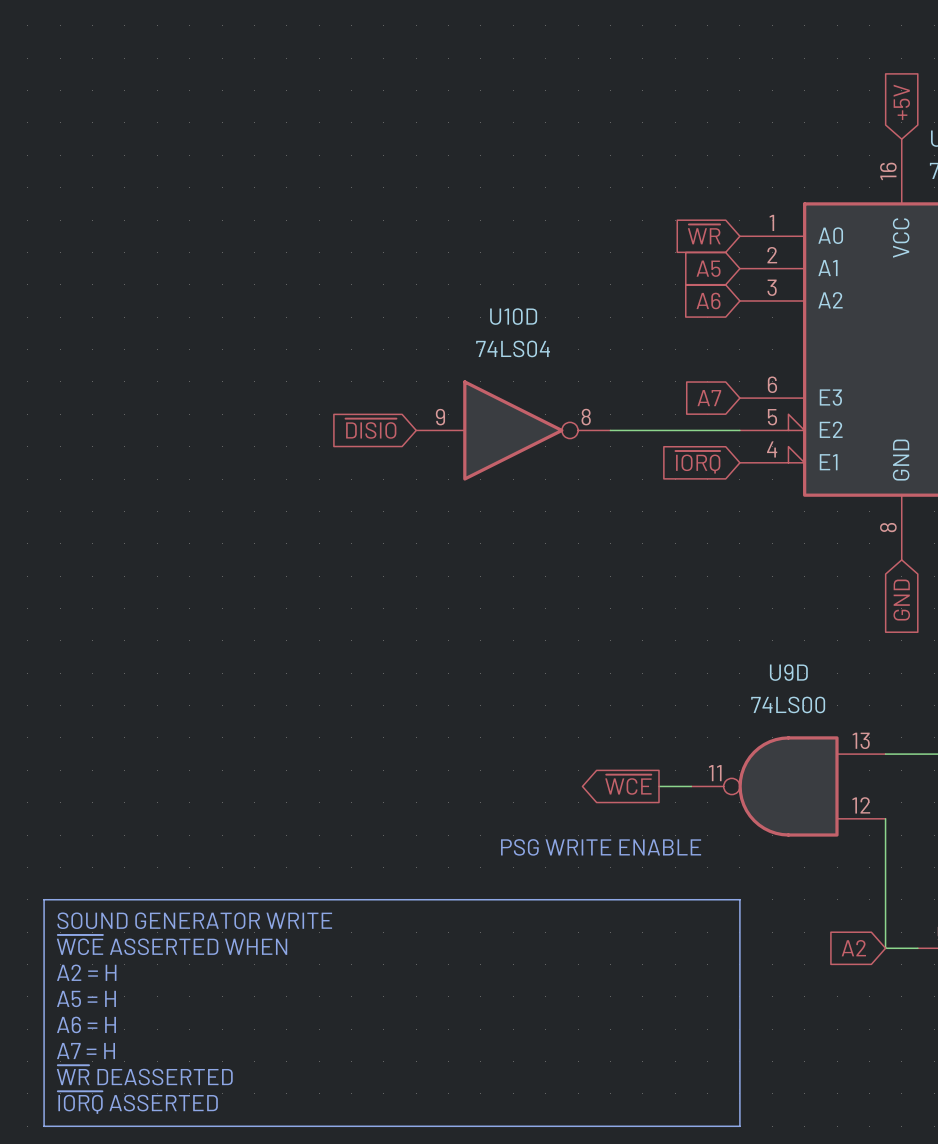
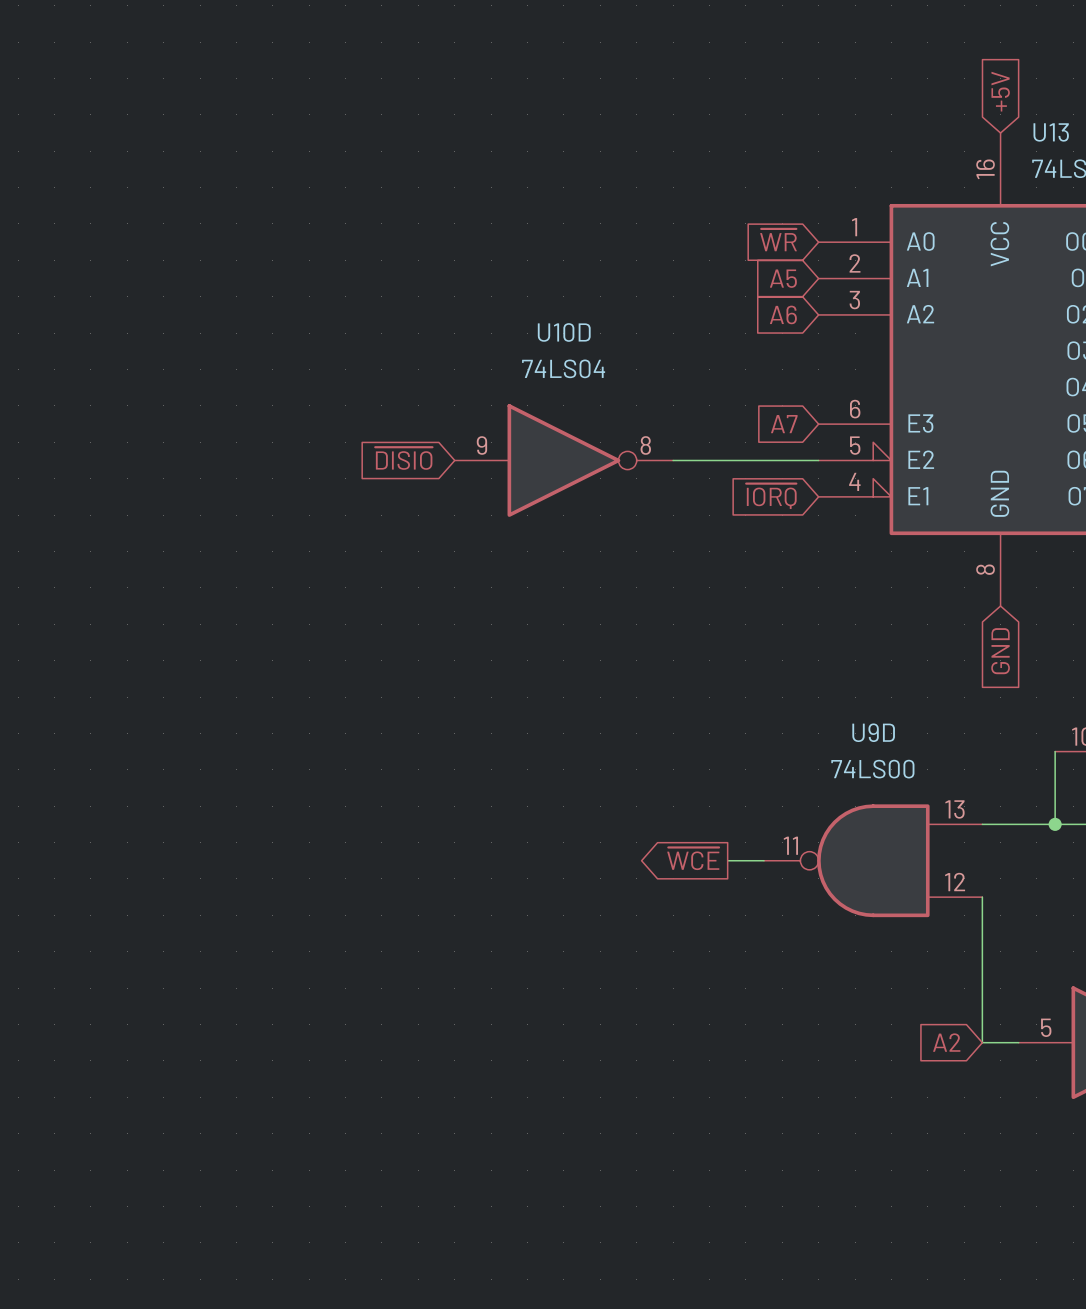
text: PSG WRITE ENABLE (601, 847) -> none
line: (44, 899) (739, 899) (739, 1126) (44, 1126) (44, 899) -> none
text: SOUND GENERATOR WRITE (194, 920) -> none
text: ~{WCE} ASSERTED WHEN (172, 945) -> none
text: A2 = H (86, 972) -> none
text: A5 = H (86, 998) -> none
text: A6 = H (86, 1024) -> none
text: A7 = H (85, 1051) -> none
text: ~{WR} DEASSERTED (144, 1075) -> none
text: ~{IORQ} ASSERTED (137, 1102) -> none

